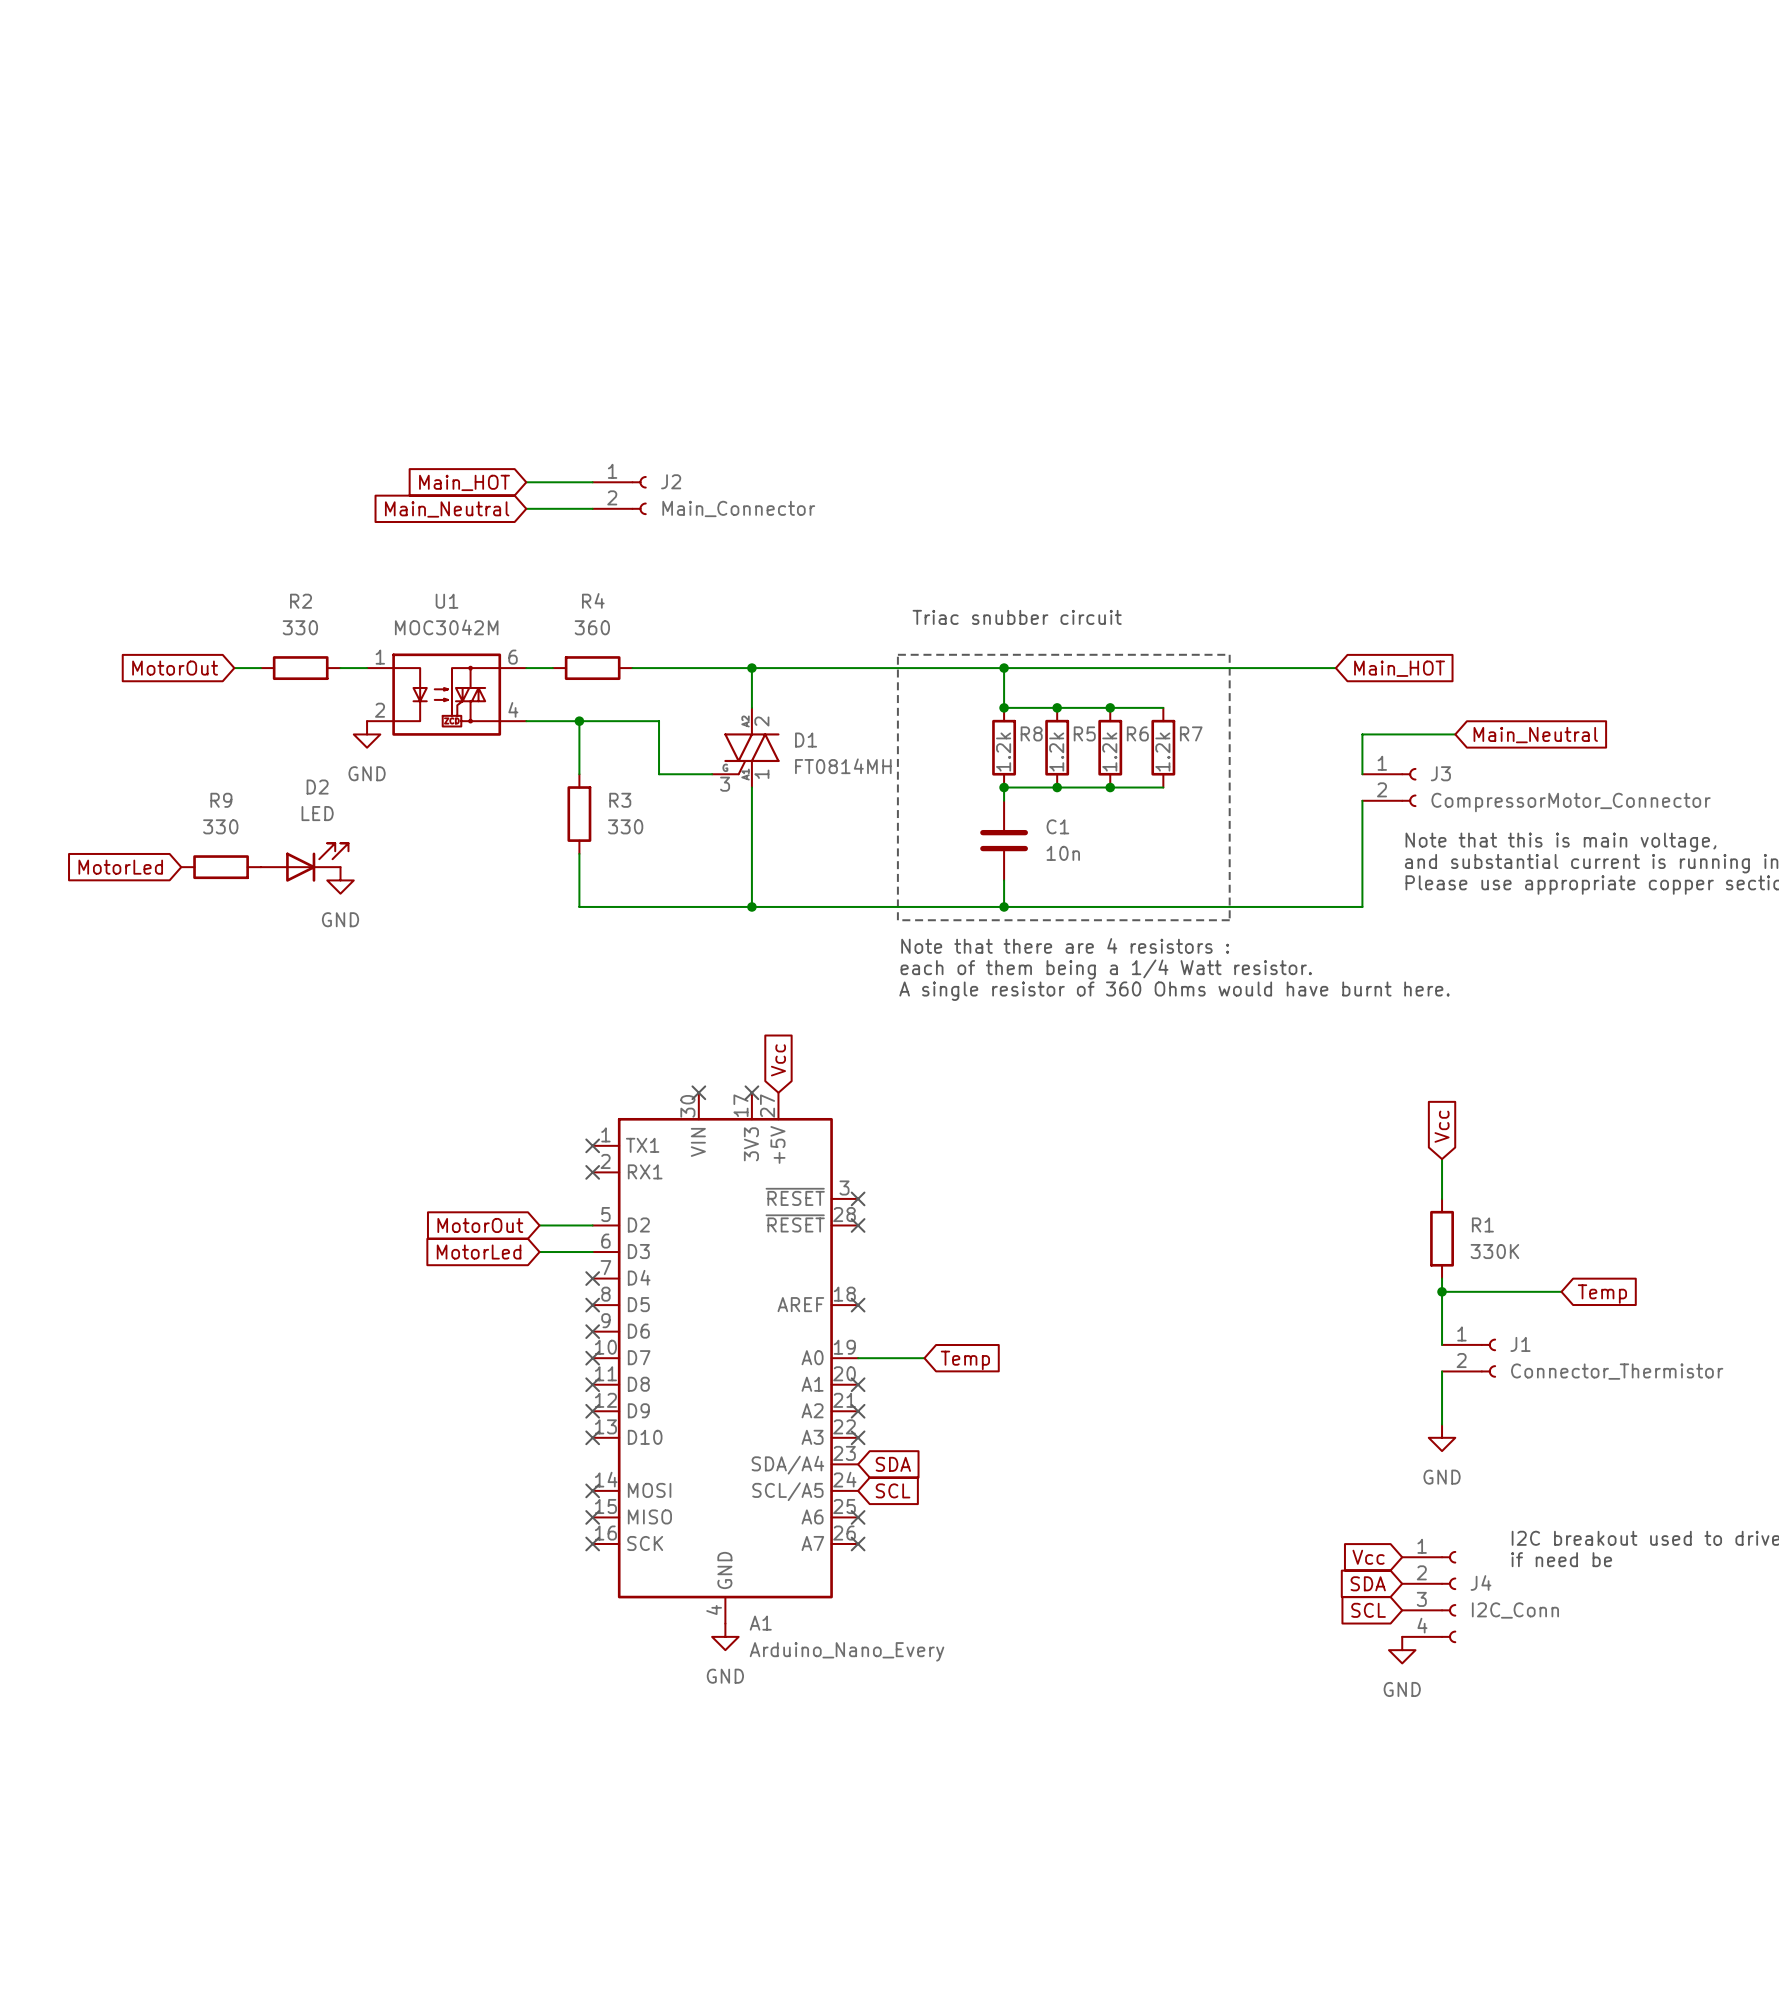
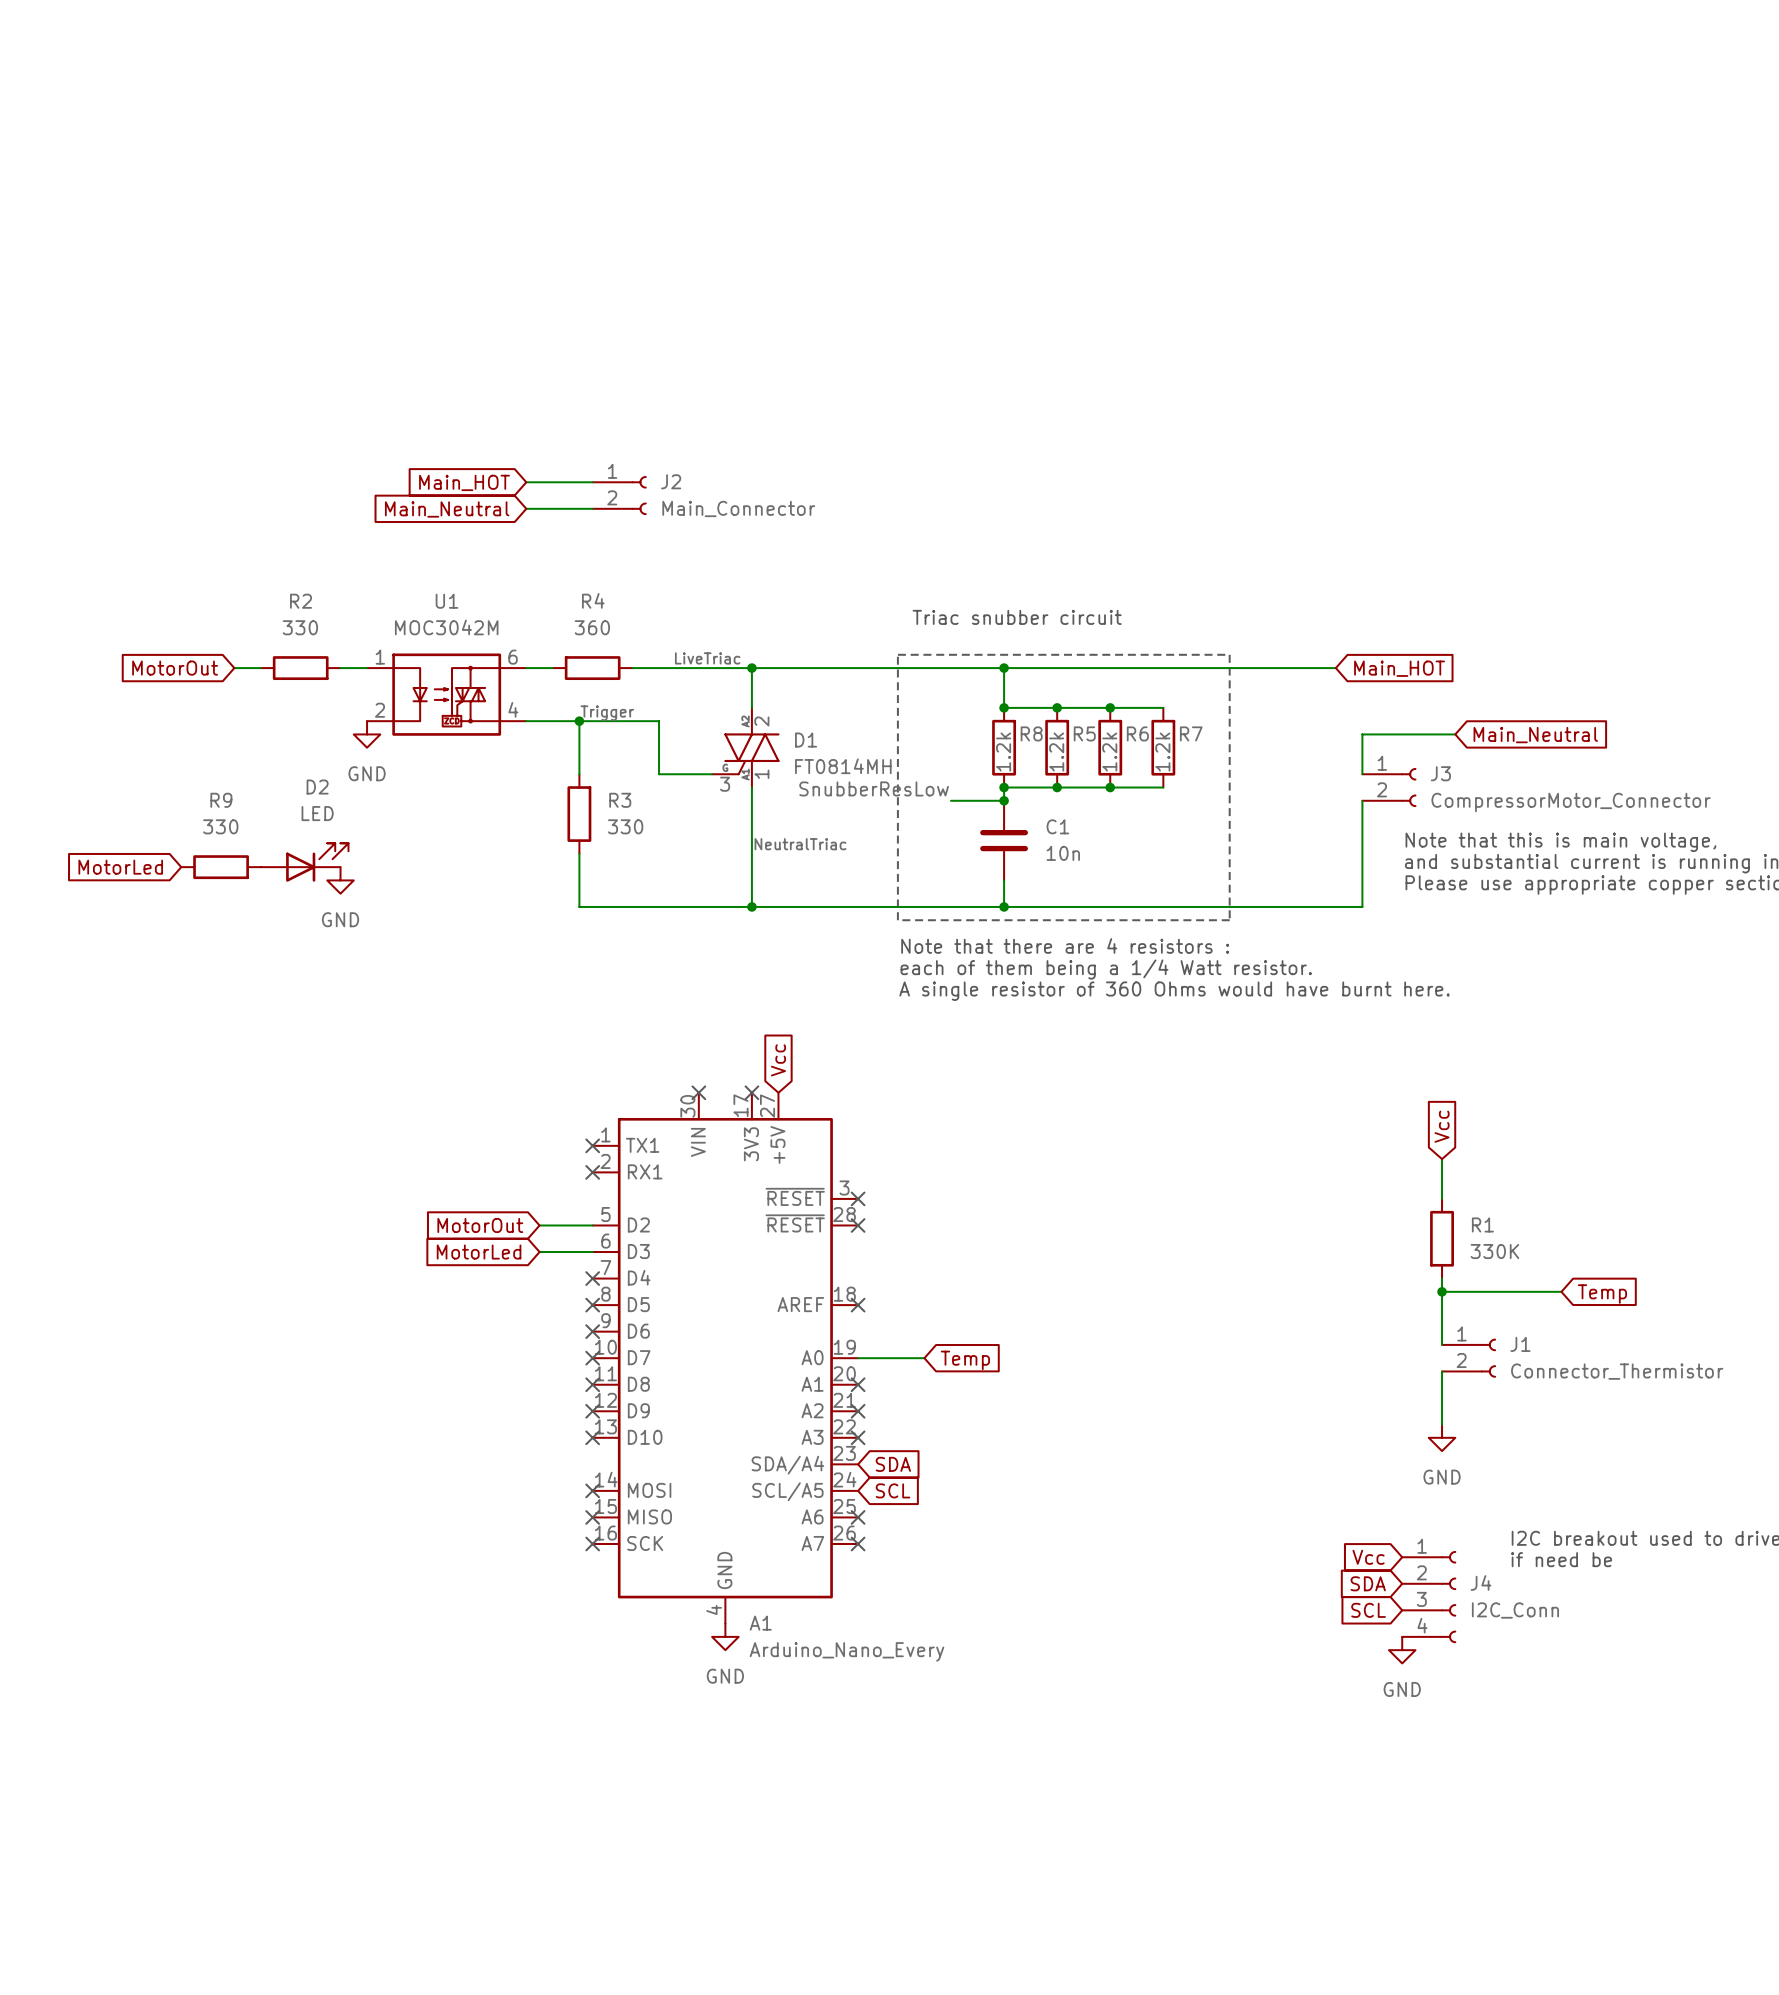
label: none -> LiveTriac (707, 658)
label: none -> Trigger (607, 713)
label: none -> SnubberResLow (874, 788)
wire: none -> (950, 800) (1004, 800)
junction: none -> (1004, 800)
label: none -> NeutralTriac (800, 844)

